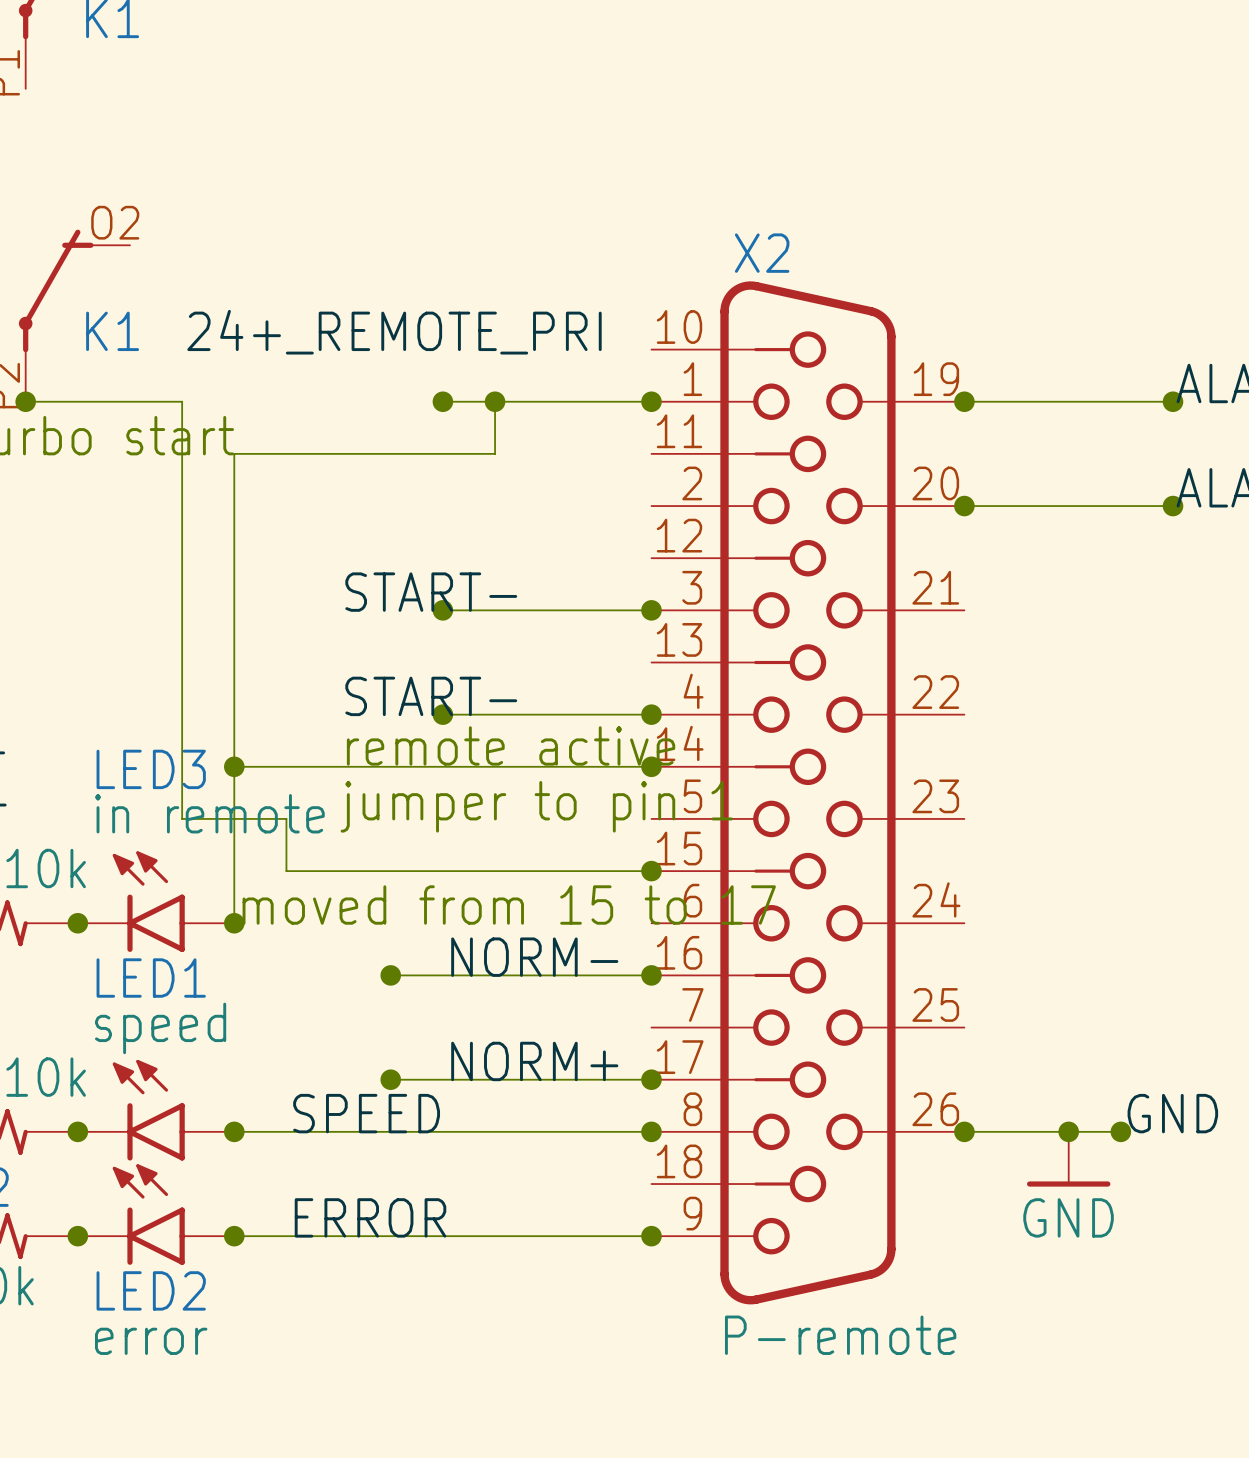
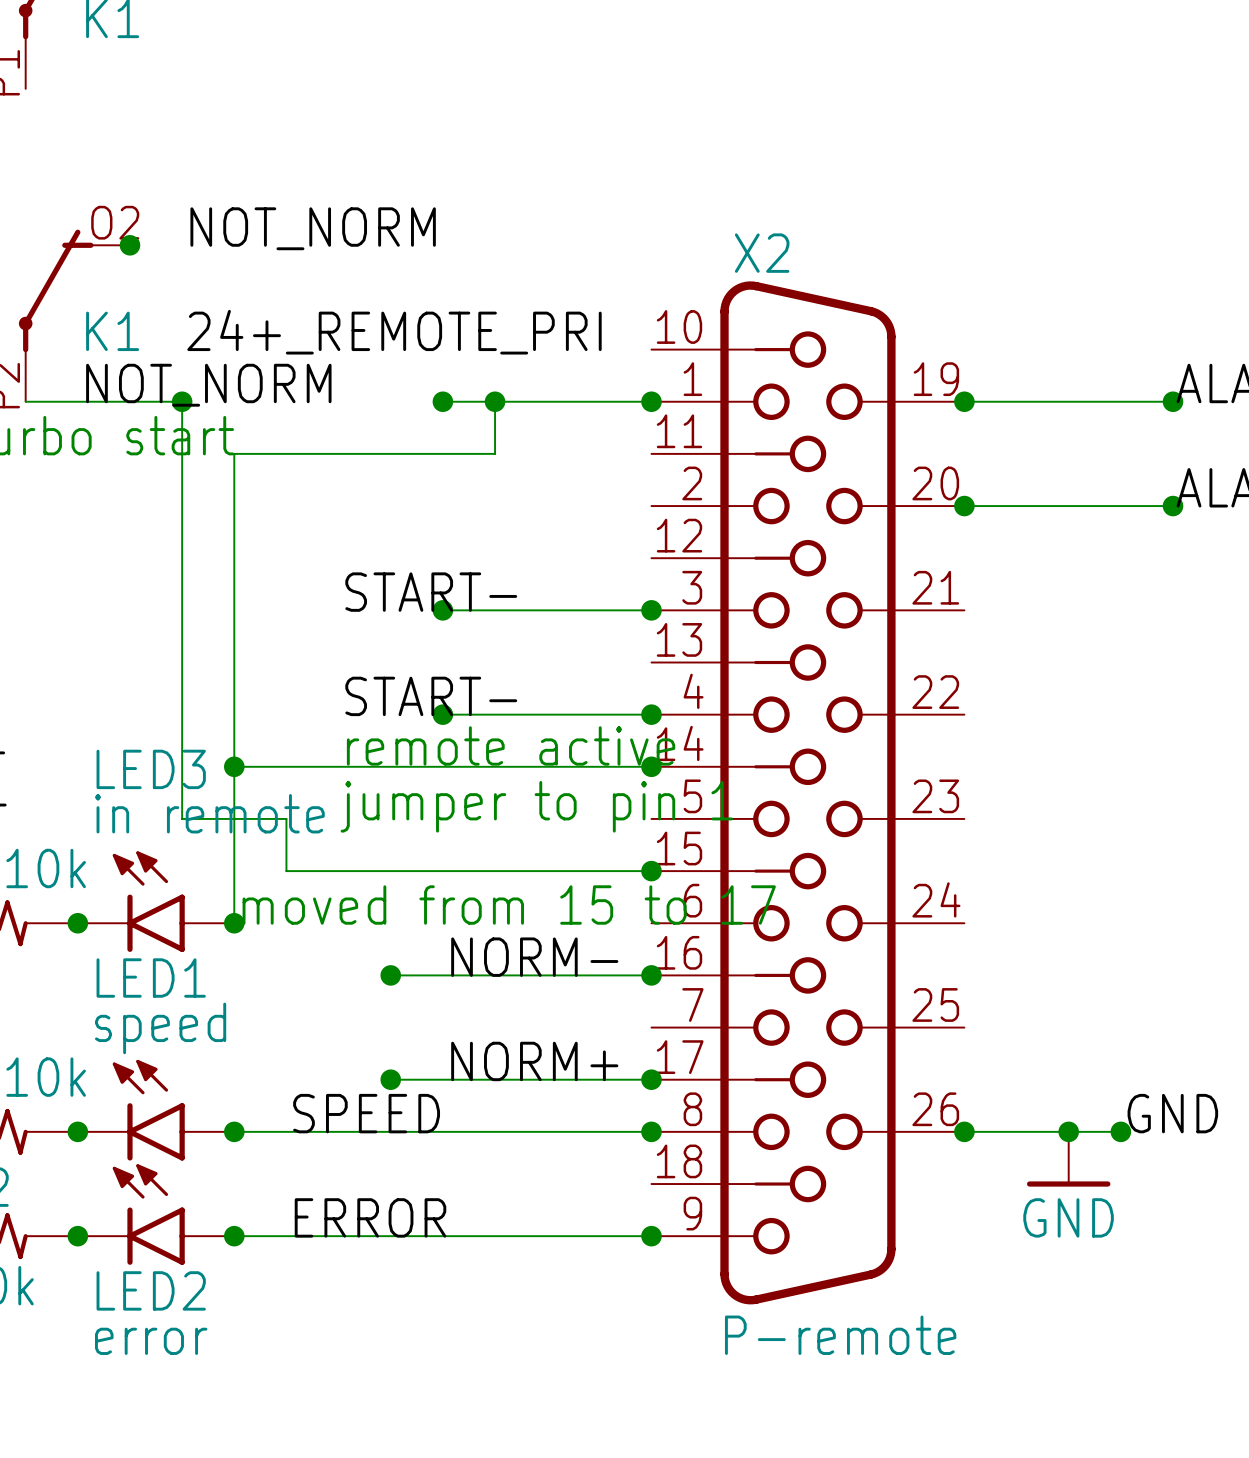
label: none -> NOT_NORM (313, 228)
junction: none -> (129, 245)
label: none -> NOT_NORM (208, 385)
junction: (25, 401) -> none
junction: none -> (182, 401)

